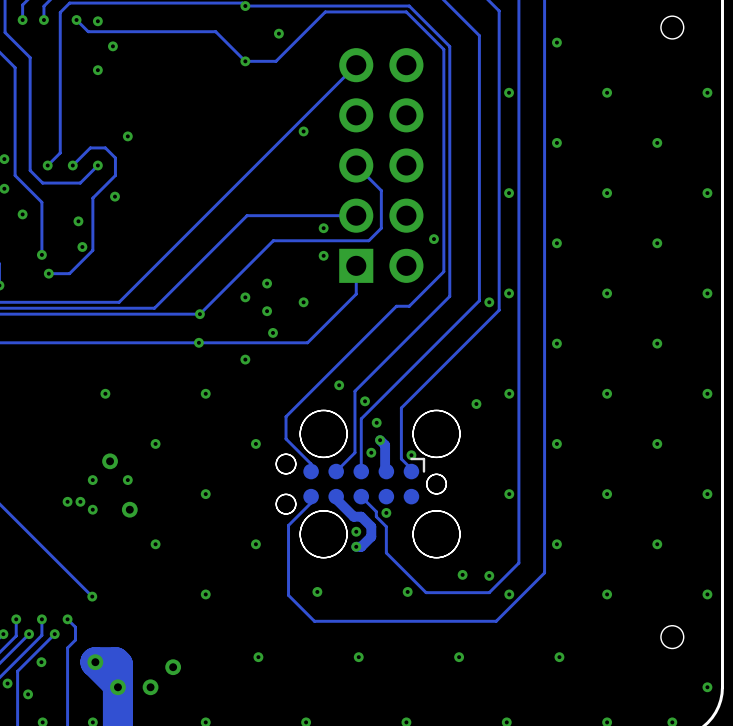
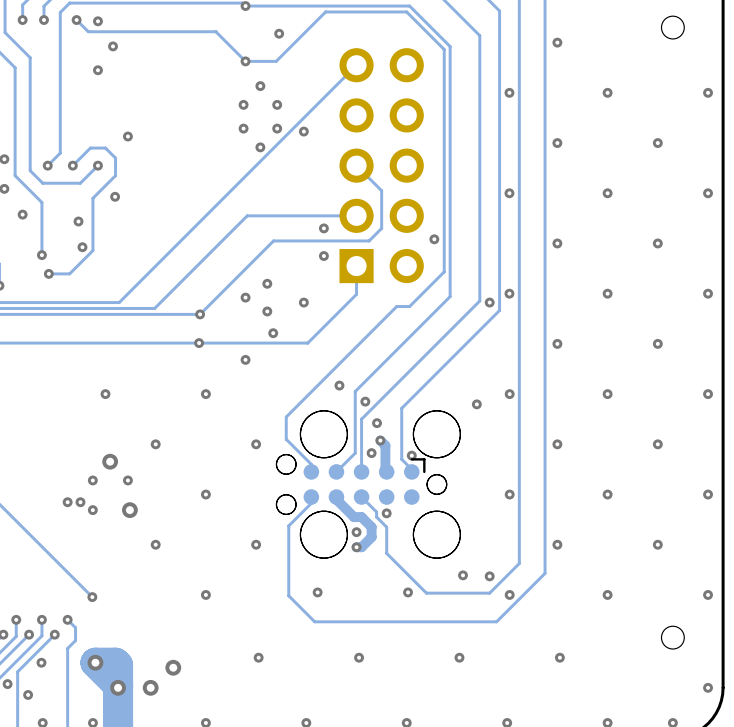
via: none -> (260, 86)
via: none -> (243, 104)
via: none -> (277, 104)
via: none -> (243, 128)
via: none -> (277, 128)
via: none -> (260, 147)

